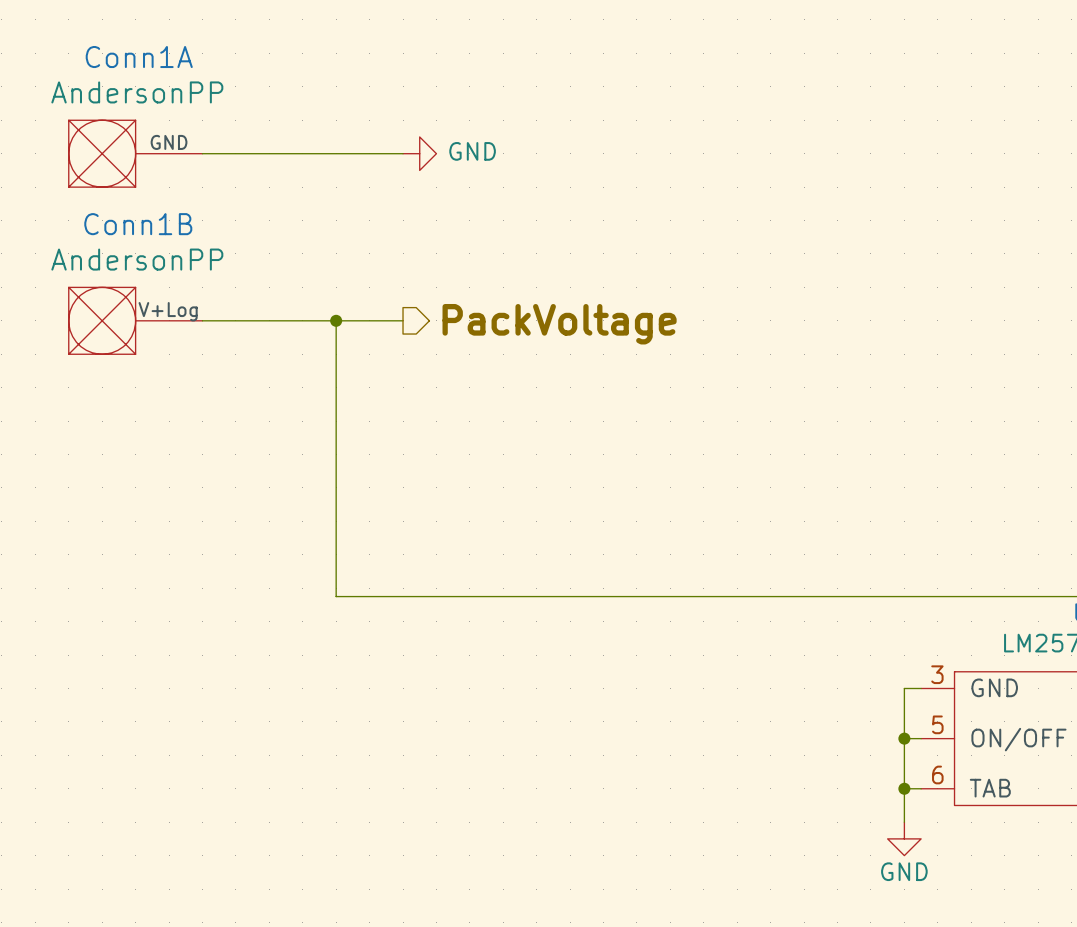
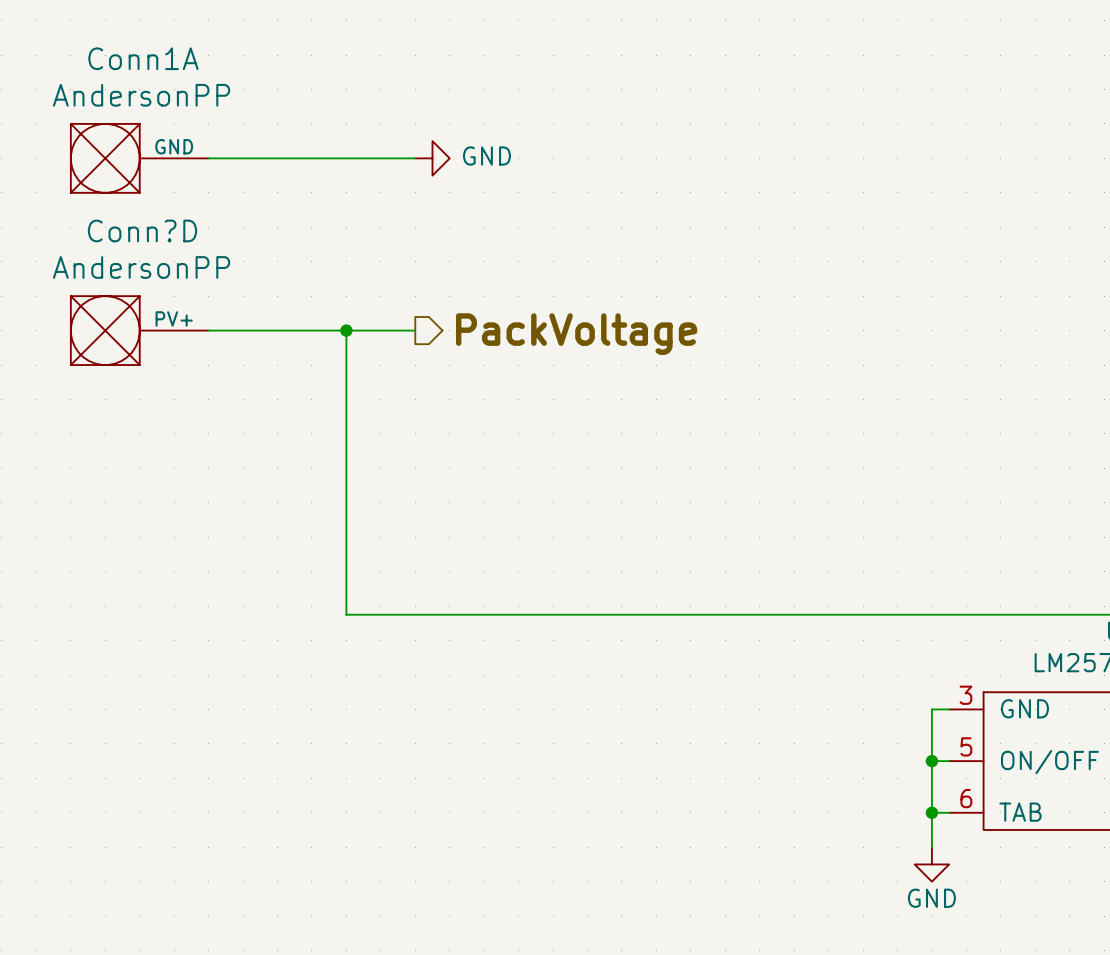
Conn1B name: Conn1B (138, 224) -> Conn?D (142, 230)
Conn1B pin name: V+Log (168, 311) -> PV+ (174, 318)

